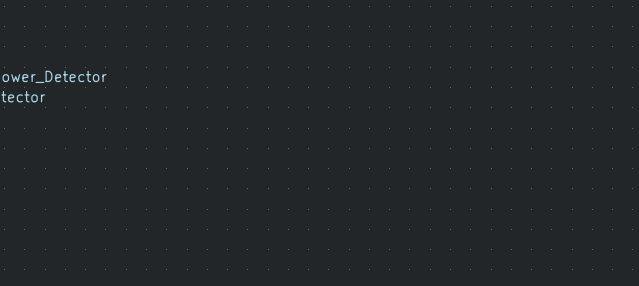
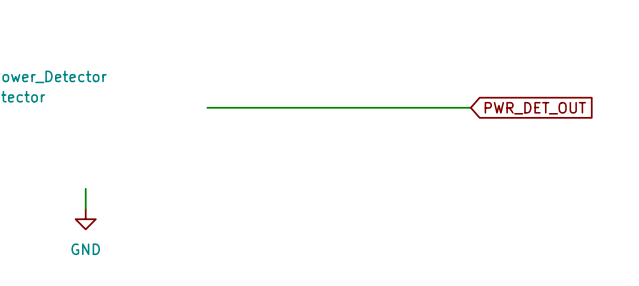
wire: none -> (207, 107) (470, 107)
global label: none -> PWR_DET_OUT (535, 108)
wire: none -> (85, 188) (85, 209)
power symbol: none -> GND (85, 219)

